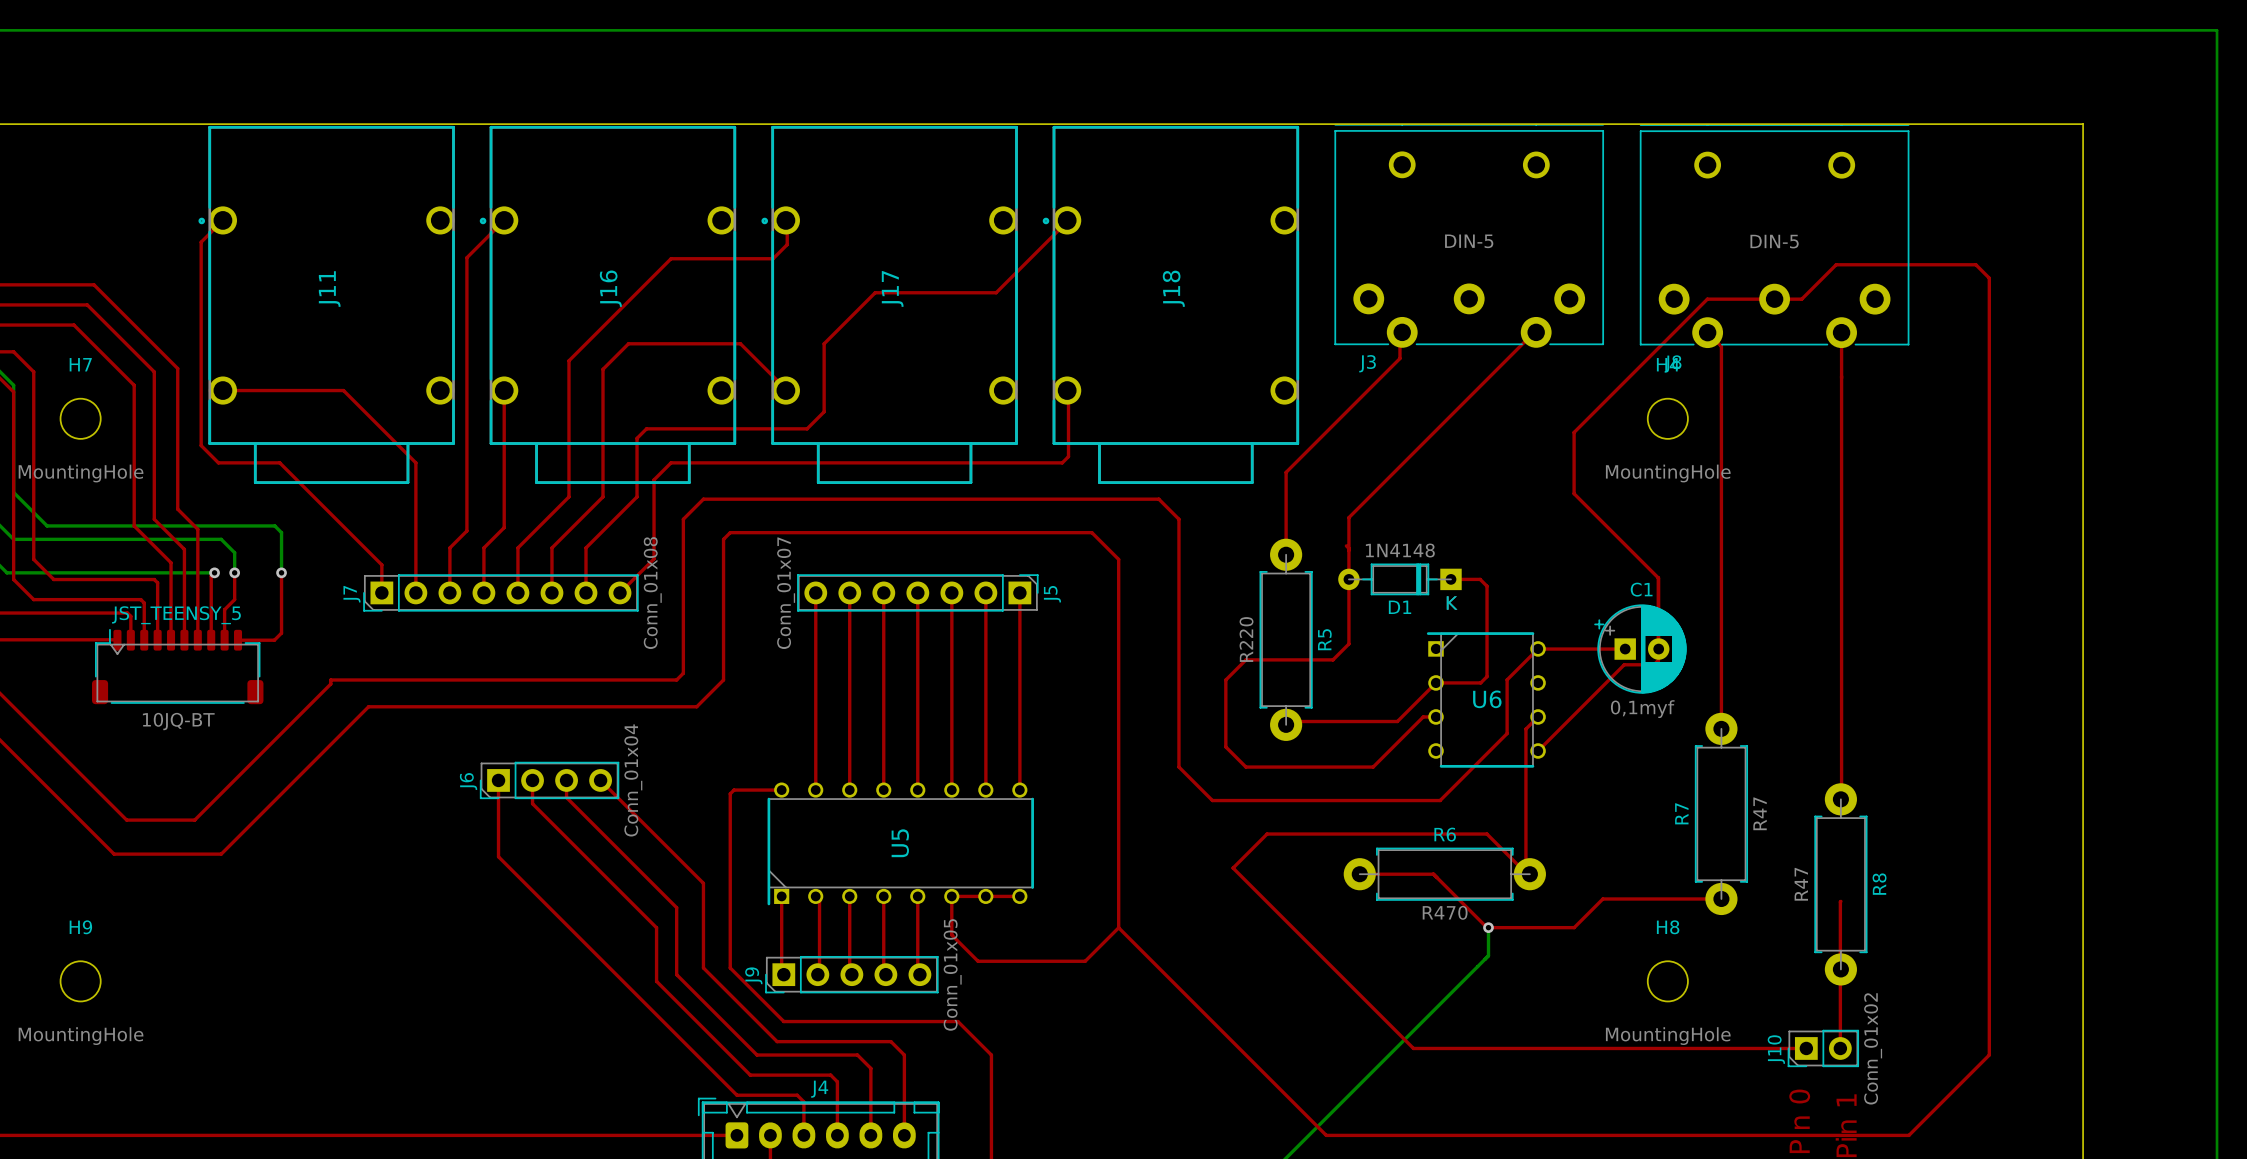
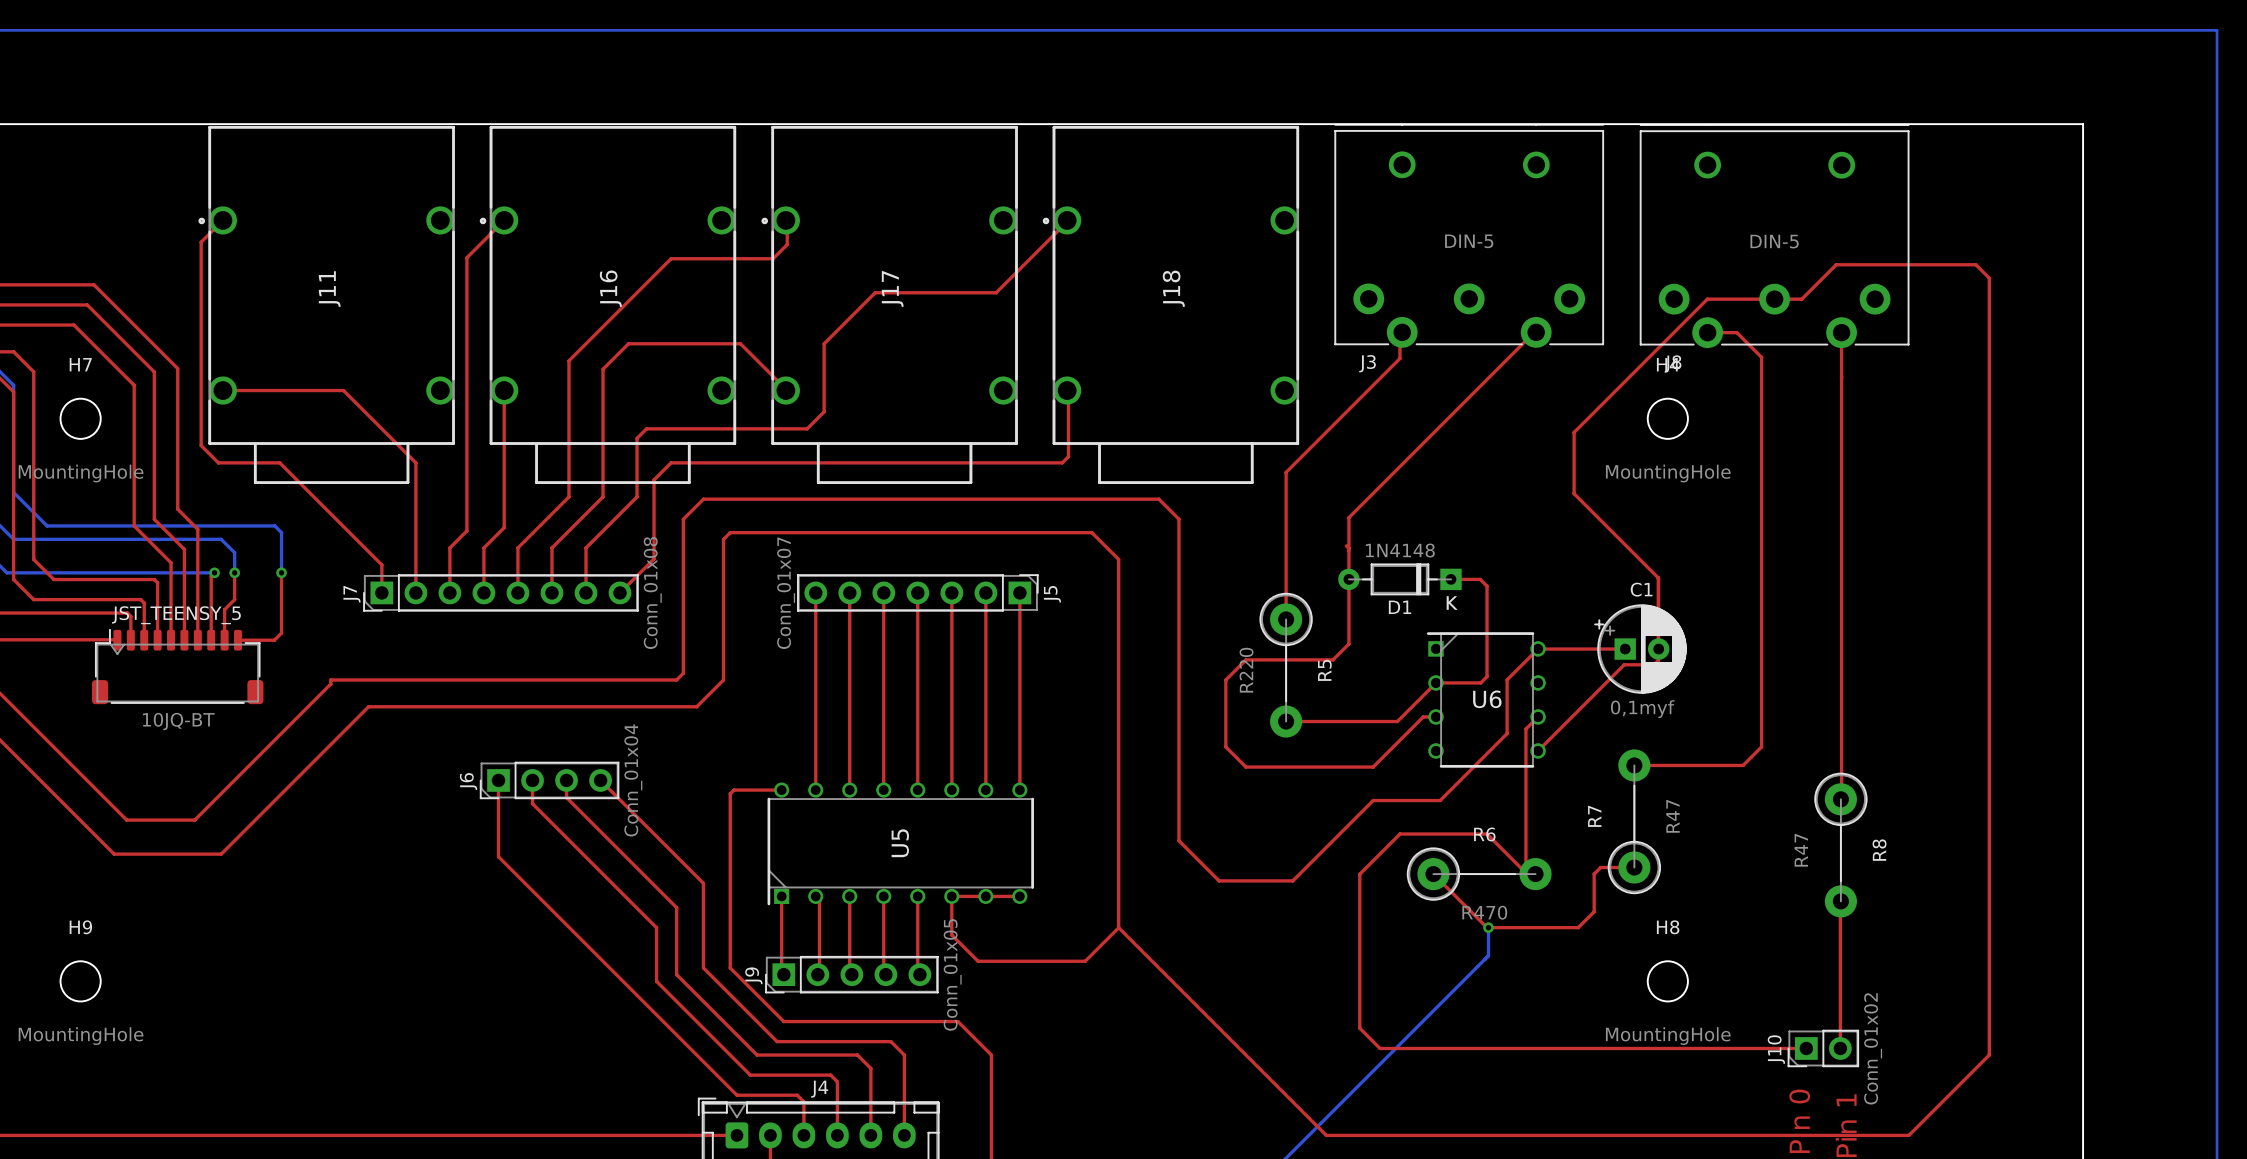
top track: (1707, 332) (1721, 346) (1721, 728) -> (1707, 332) (1736, 332) (1761, 357) (1761, 746) (1743, 765) (1634, 765)
R5 footprint: [1259, 538, 1313, 741] -> [1259, 592, 1313, 738]
top track: none -> (1286, 554) (1286, 619)
R7 footprint: [1694, 712, 1748, 916] -> [1607, 749, 1661, 895]
top track: (1178, 767) (1212, 800) (1373, 800) -> (1178, 767) (1178, 840) (1219, 880) (1292, 880) (1373, 800)
R8 footprint: [1814, 783, 1868, 986] -> [1814, 772, 1868, 918]
top track: (1399, 834) (1267, 834) (1233, 868) (1413, 1048) -> (1399, 834) (1359, 874) (1359, 1028) (1380, 1048) (1413, 1048)
R6 footprint: [1343, 847, 1546, 901] -> [1406, 847, 1552, 901]
top track: (1359, 874) (1433, 874) -> none
top track: (1721, 898) (1602, 898) (1574, 927) -> (1634, 867) (1600, 867) (1594, 874) (1594, 911) (1578, 927) (1574, 927)

